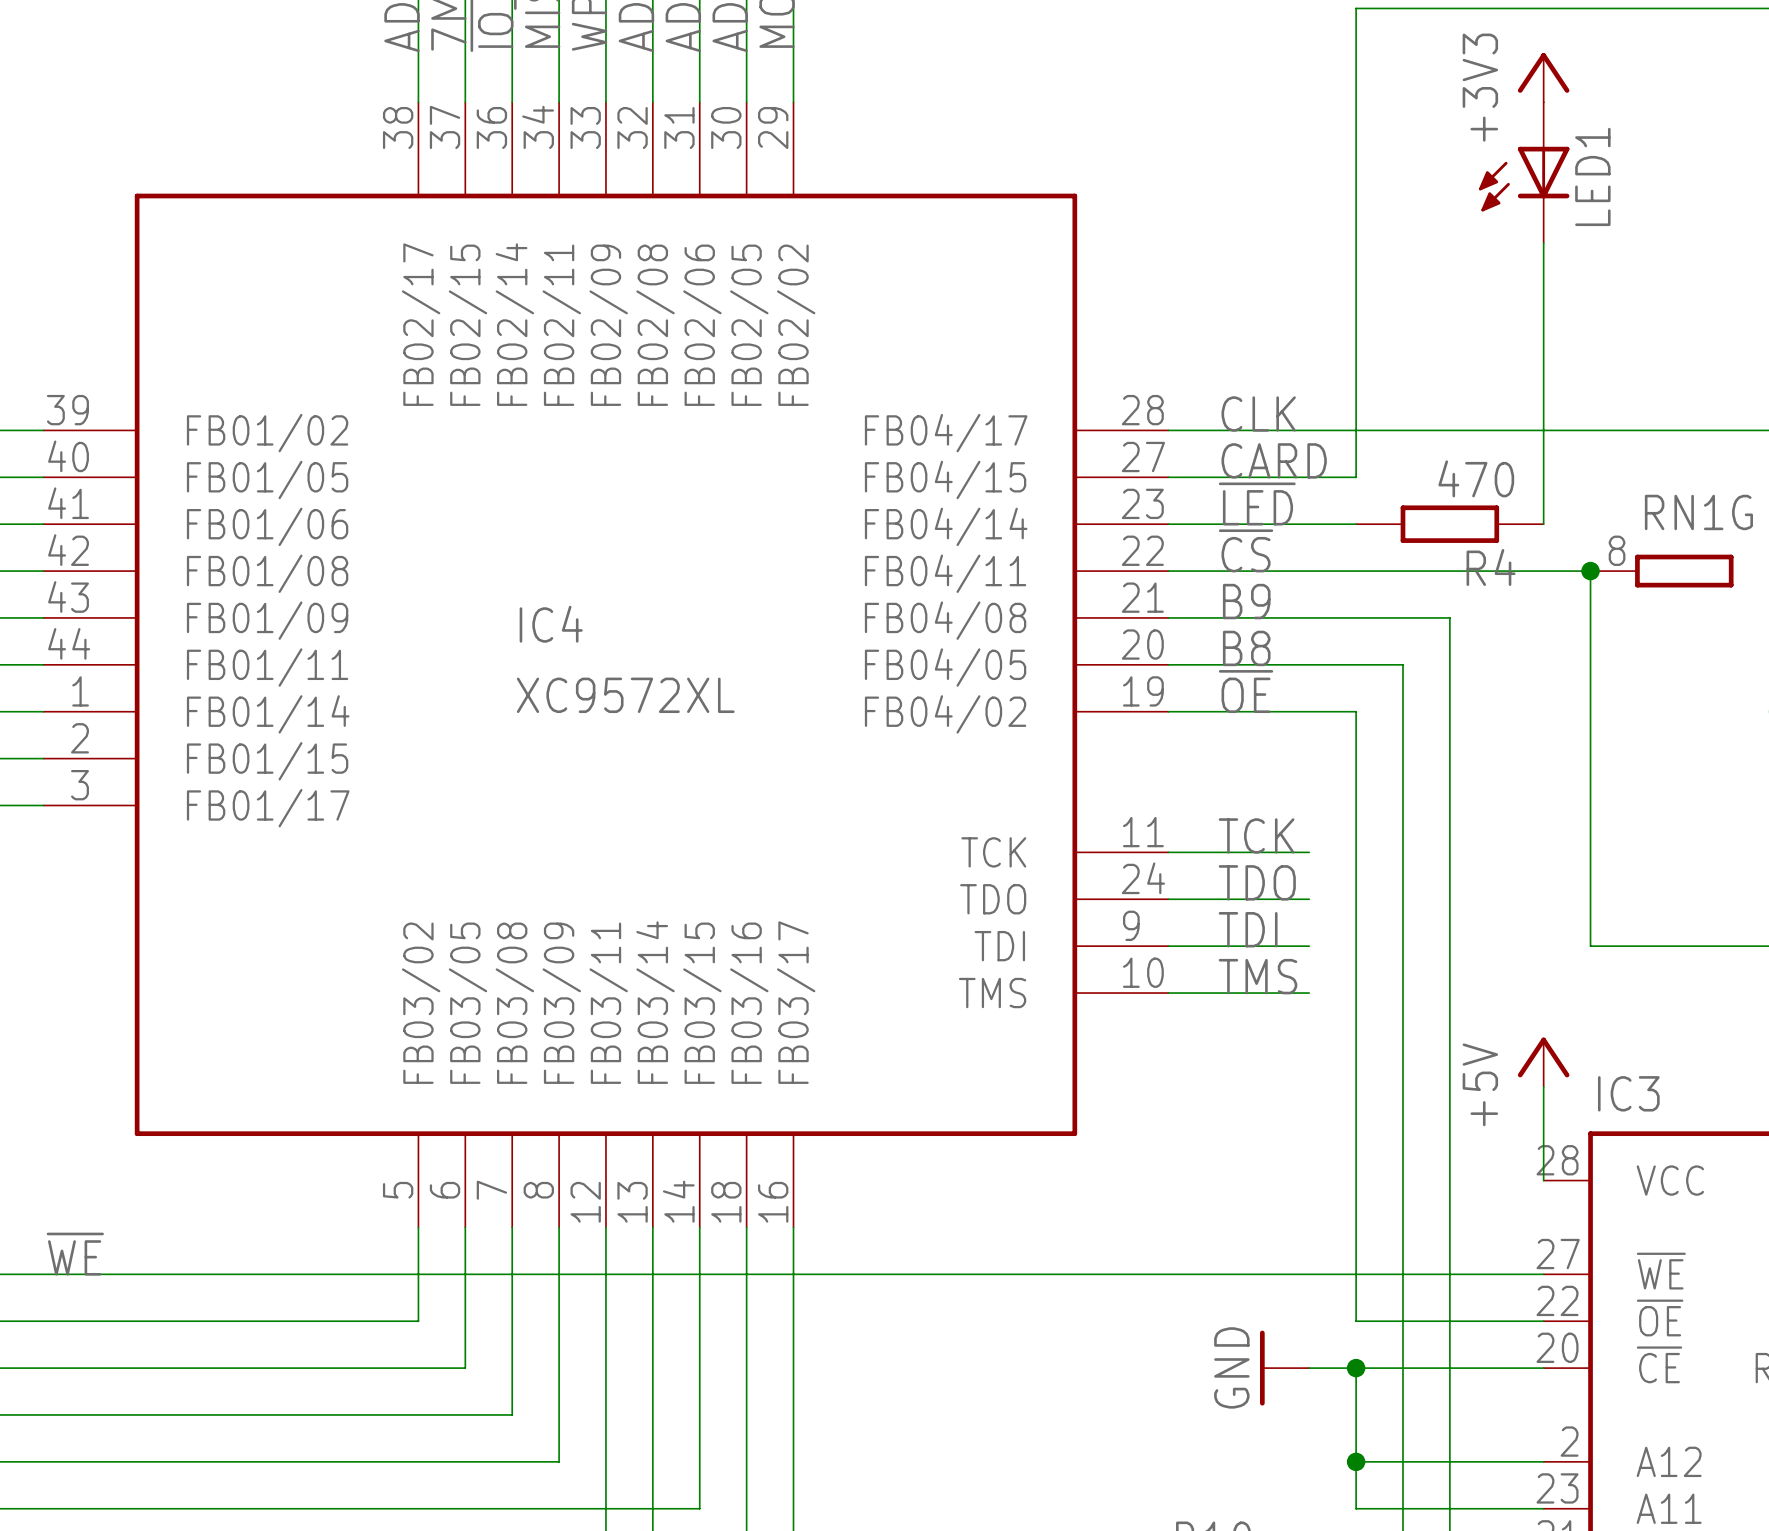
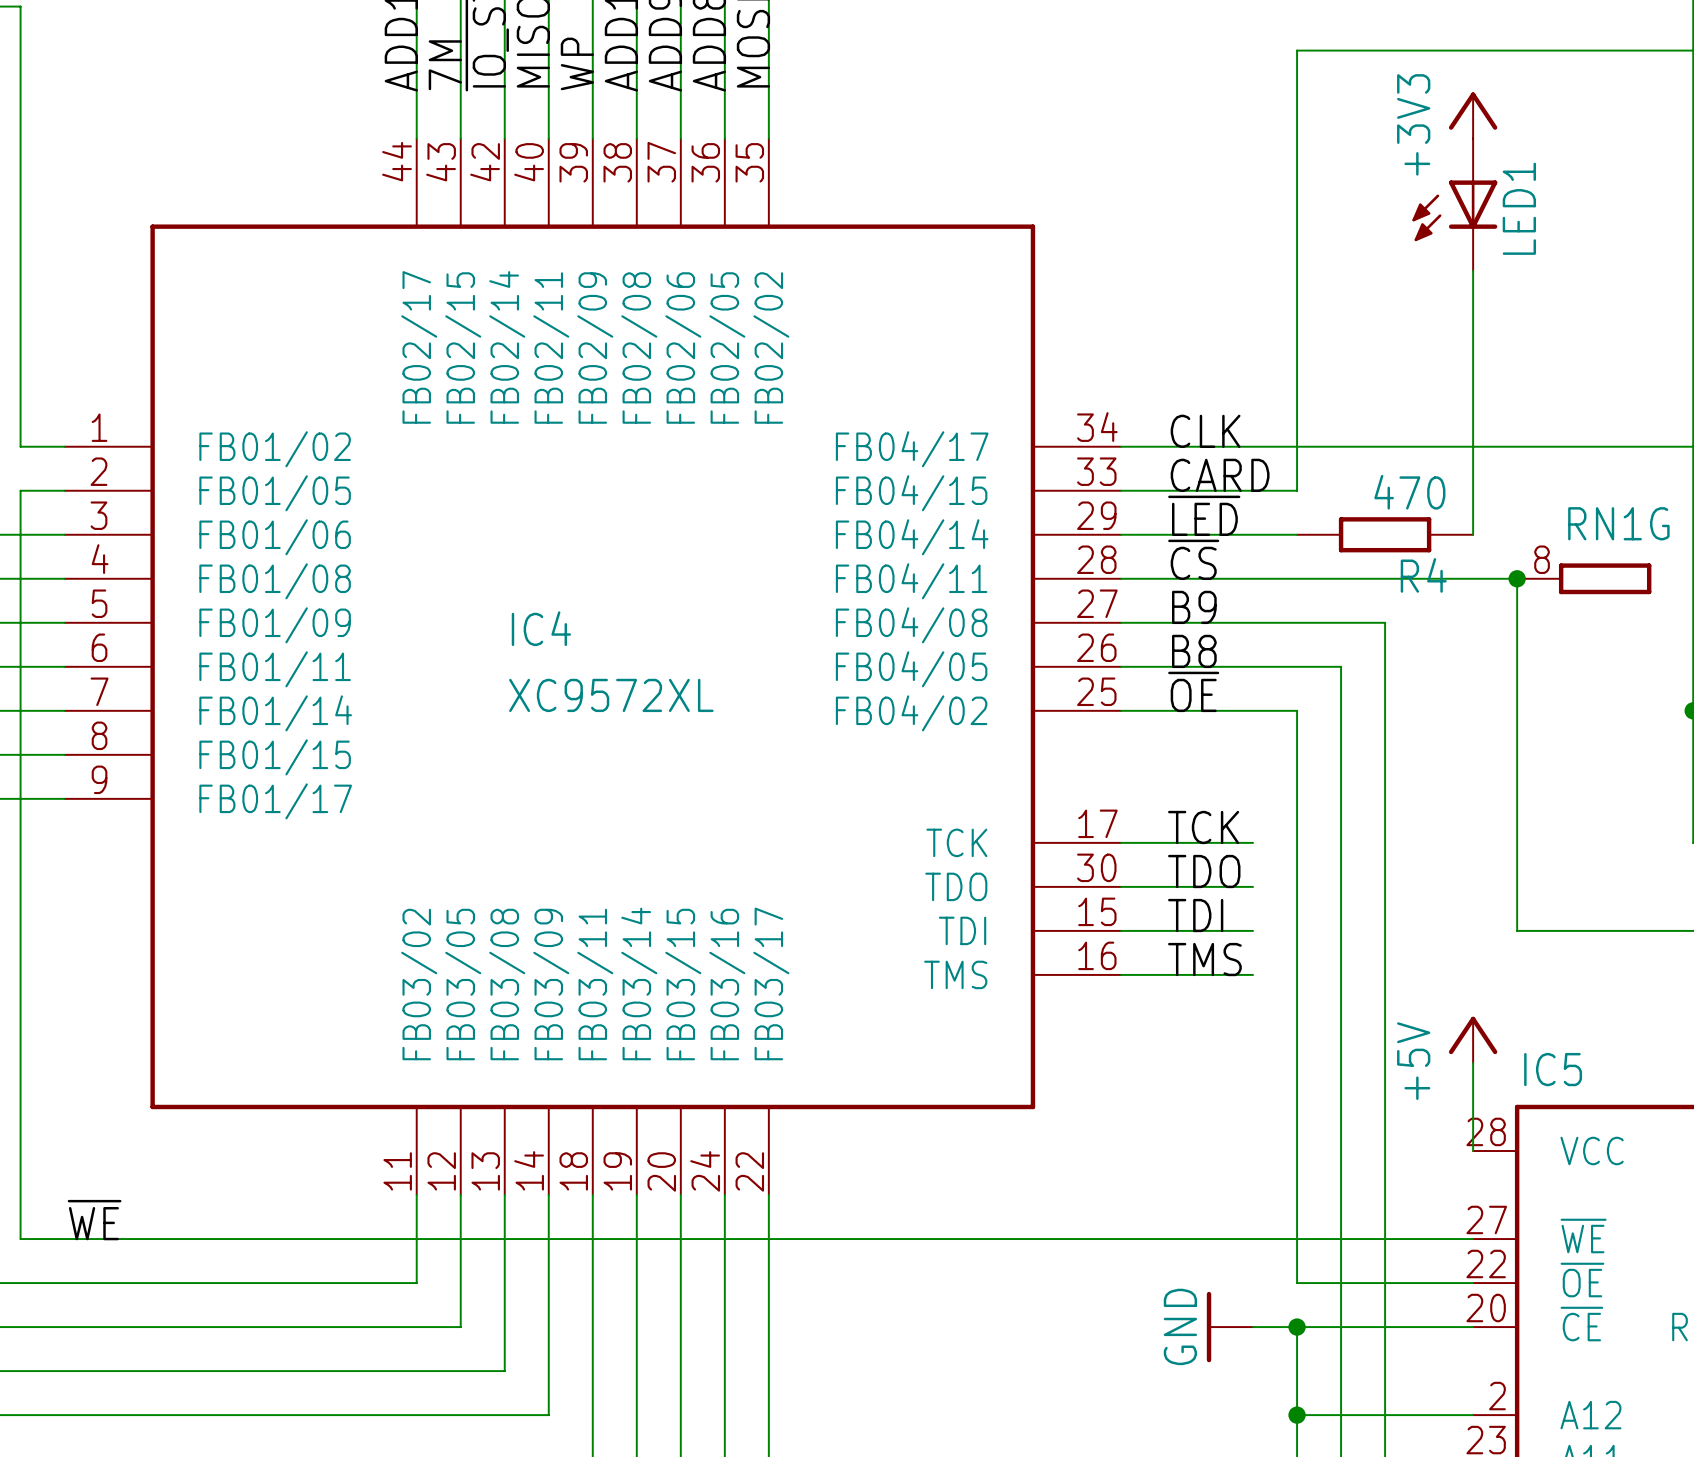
IC4 symbol: [43, 102, 1169, 1228] -> [64, 138, 1121, 1196]
IC3 name: IC3 (1628, 1093) -> IC5 (1553, 1069)

